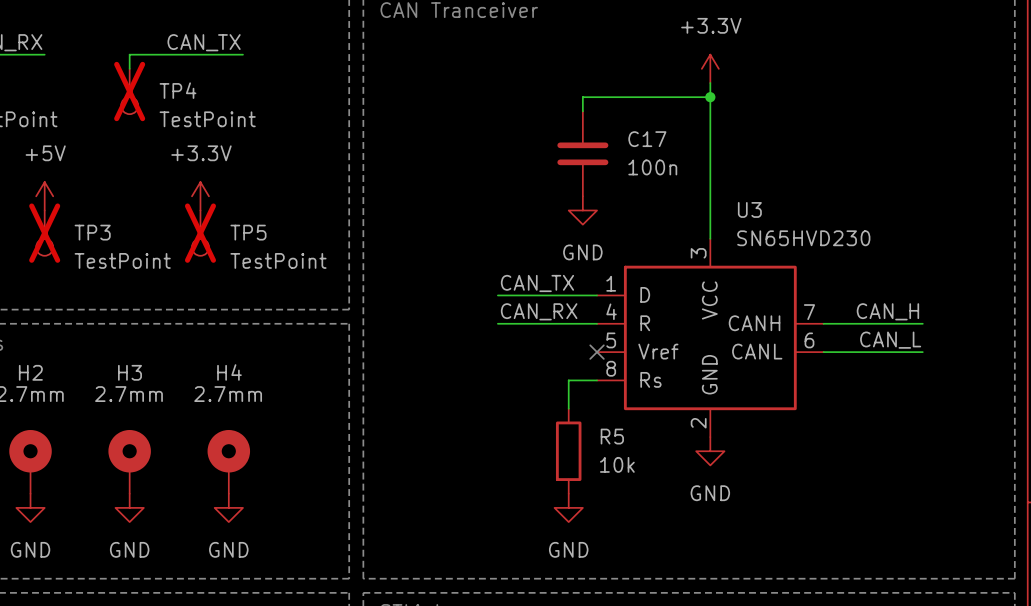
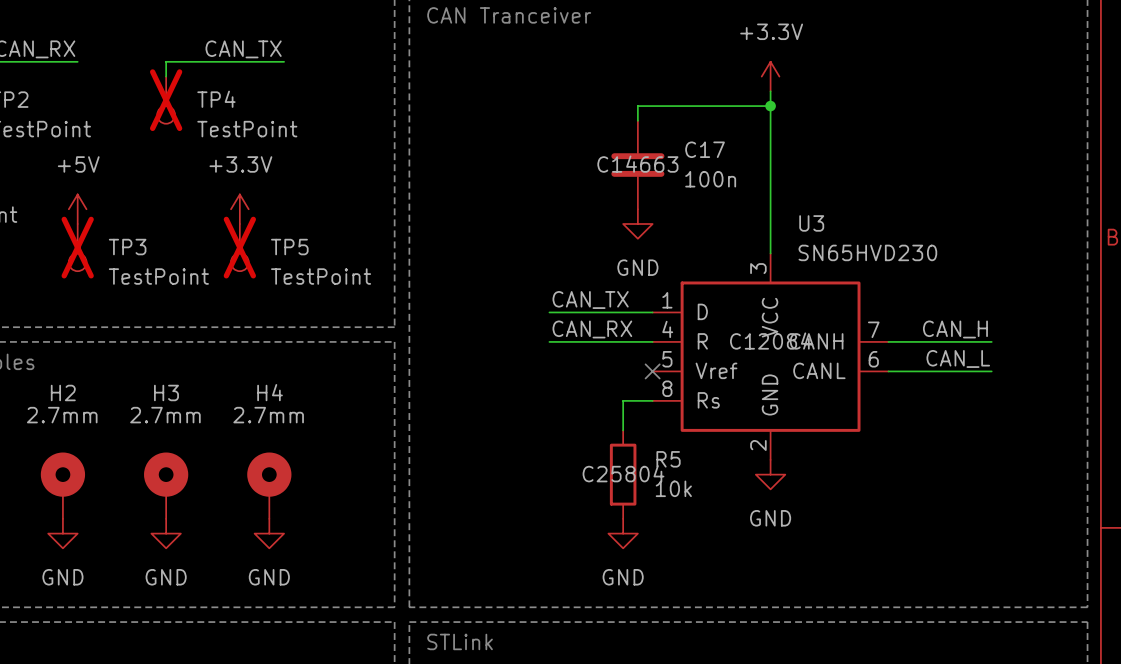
C17 text: none -> C14663 (637, 164)
U3 text: none -> C12084 (770, 341)
R5 text: none -> C25804 (623, 473)

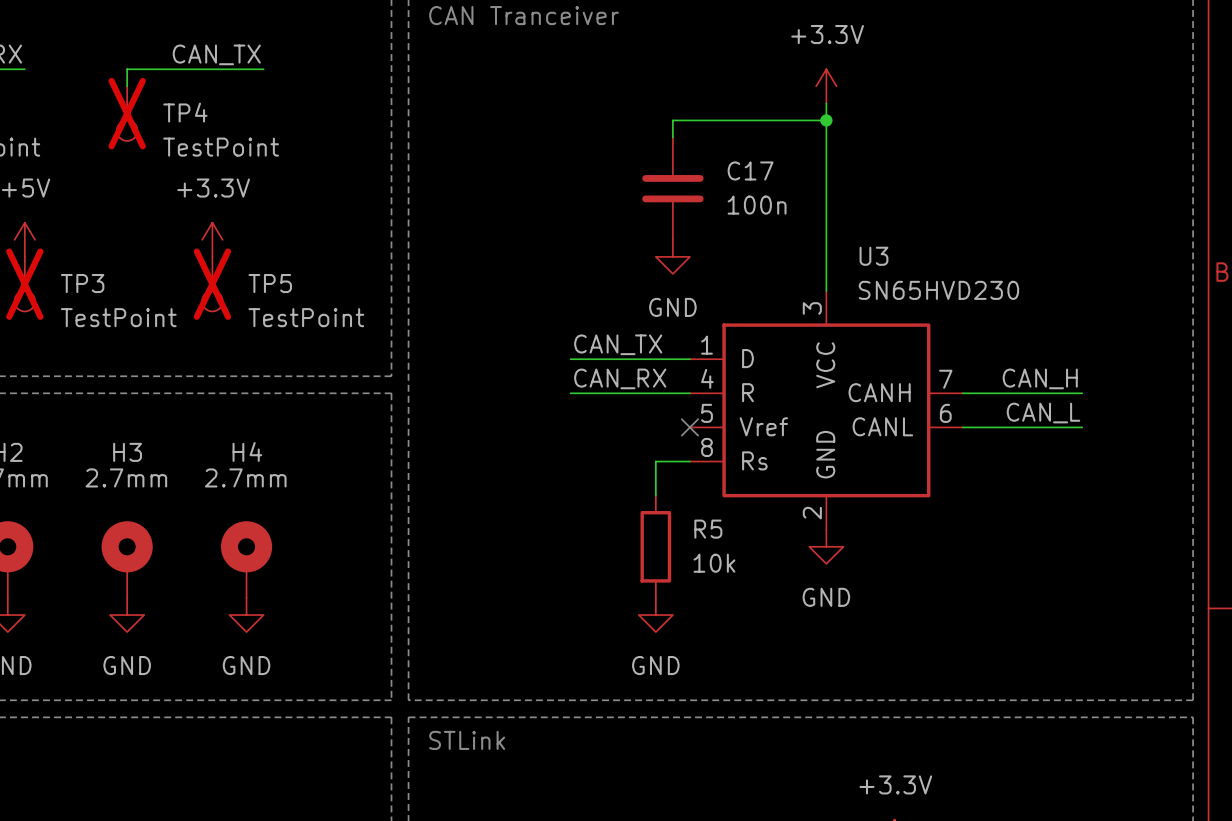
C17 text: C14663 (637, 164) -> none
U3 text: C12084 (770, 341) -> none
R5 text: C25804 (623, 473) -> none

